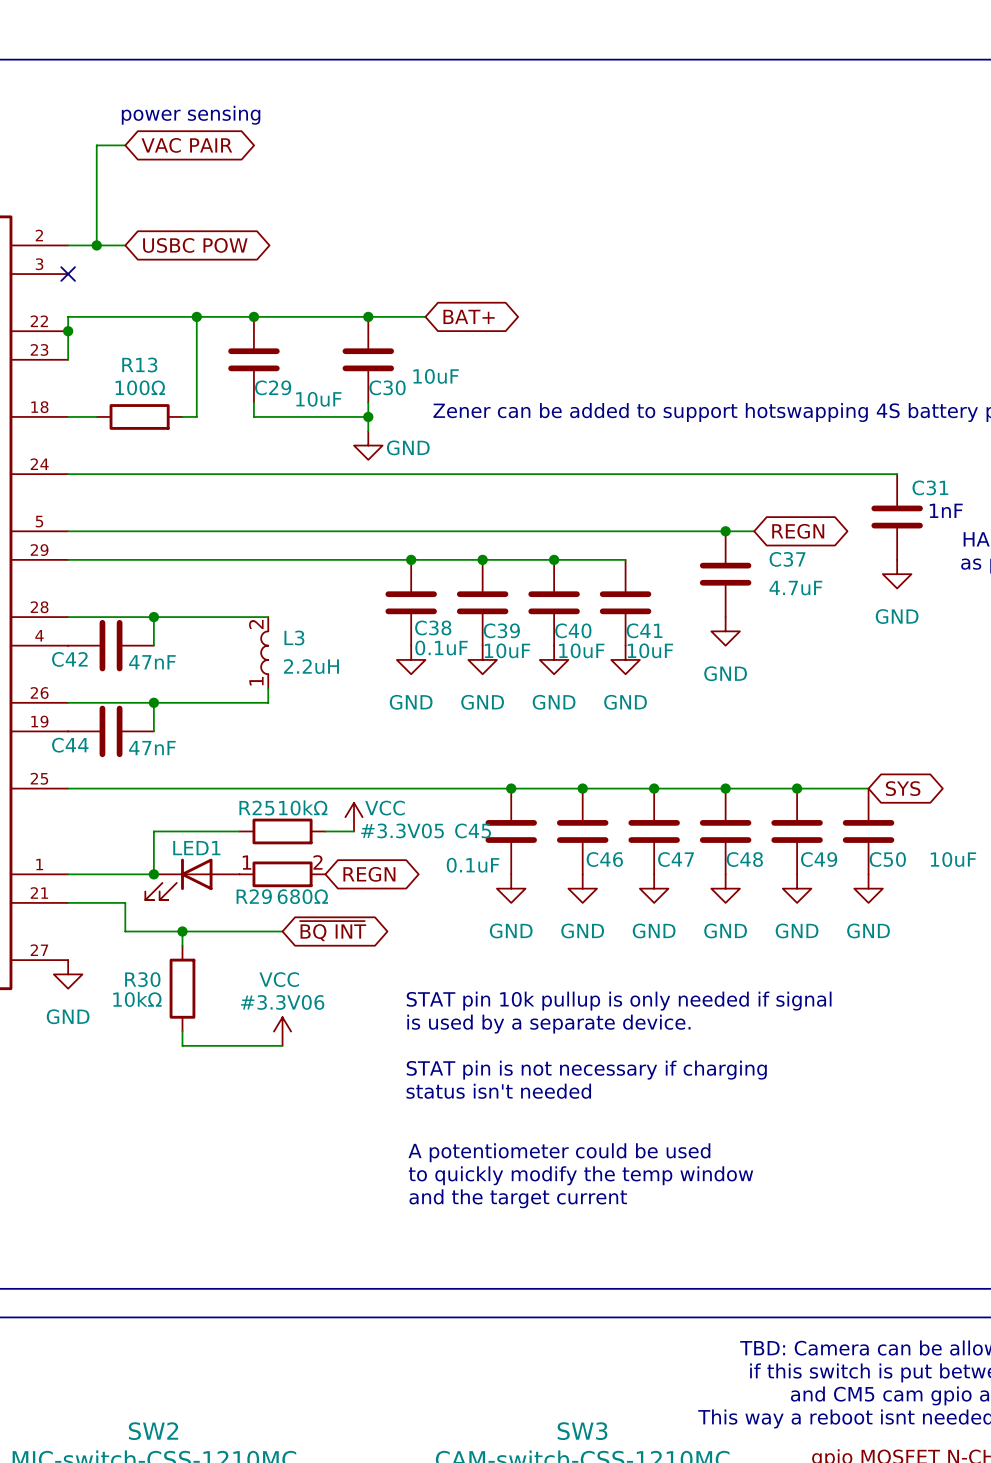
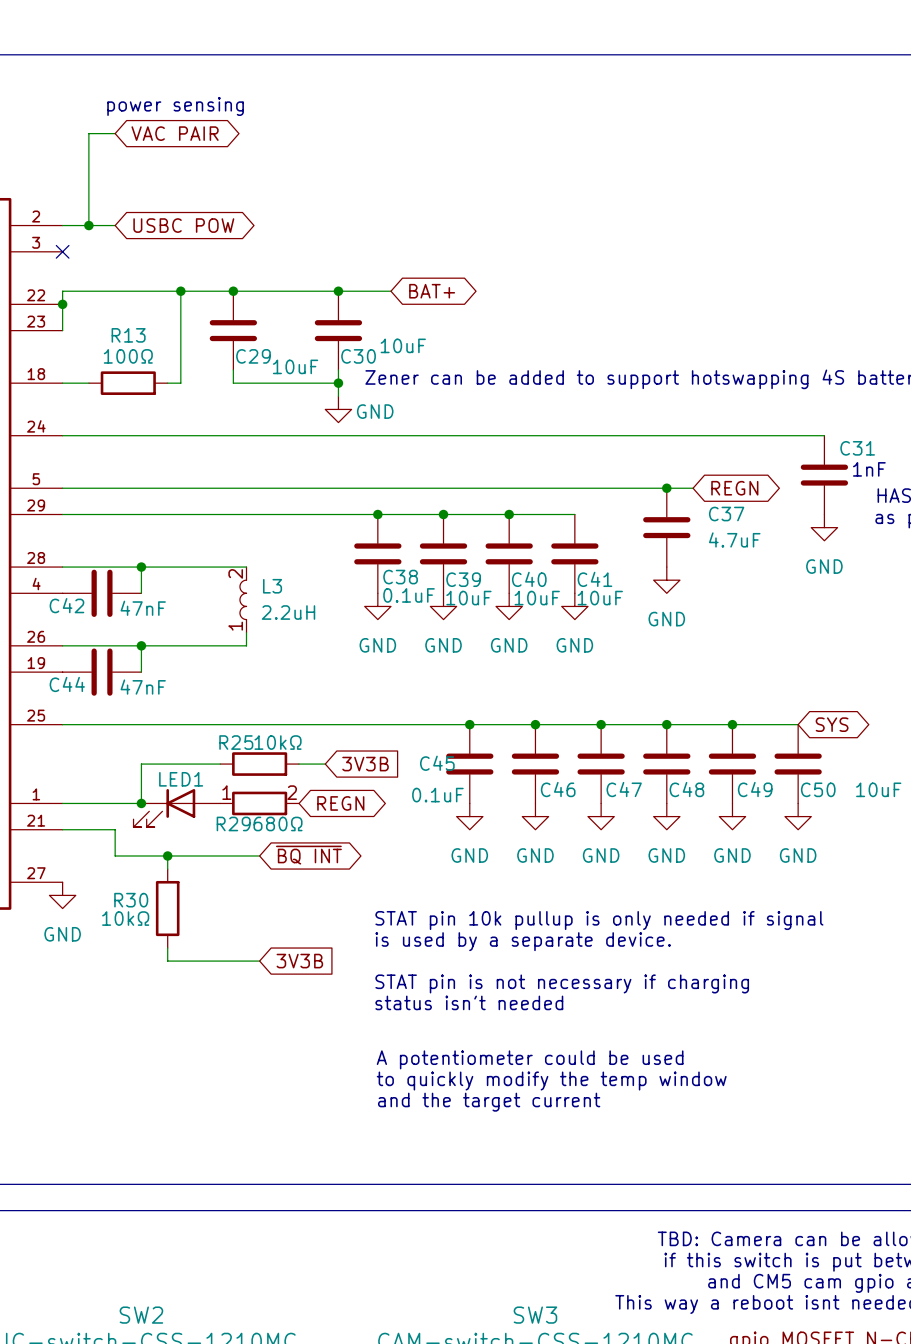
#3.3V05: VCC (354, 817) -> none
global label: none -> 3V3B (365, 764)
#3.3V06: VCC (282, 1031) -> none
global label: none -> 3V3B (299, 961)

